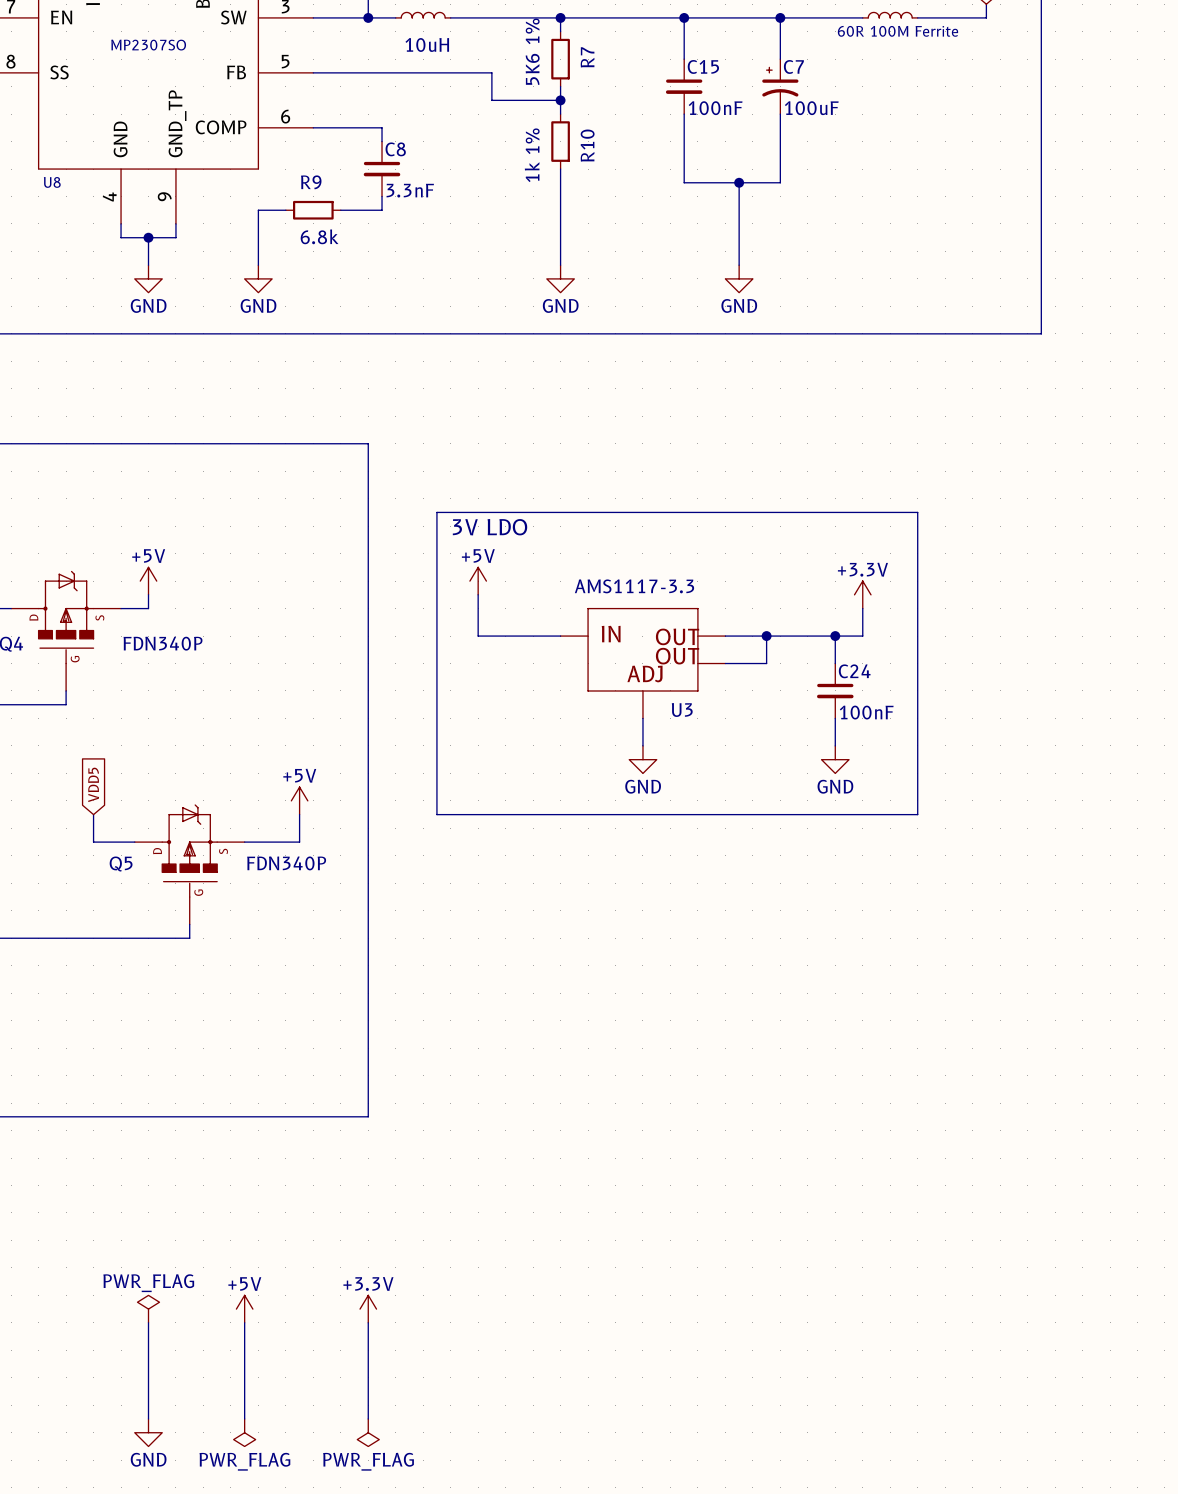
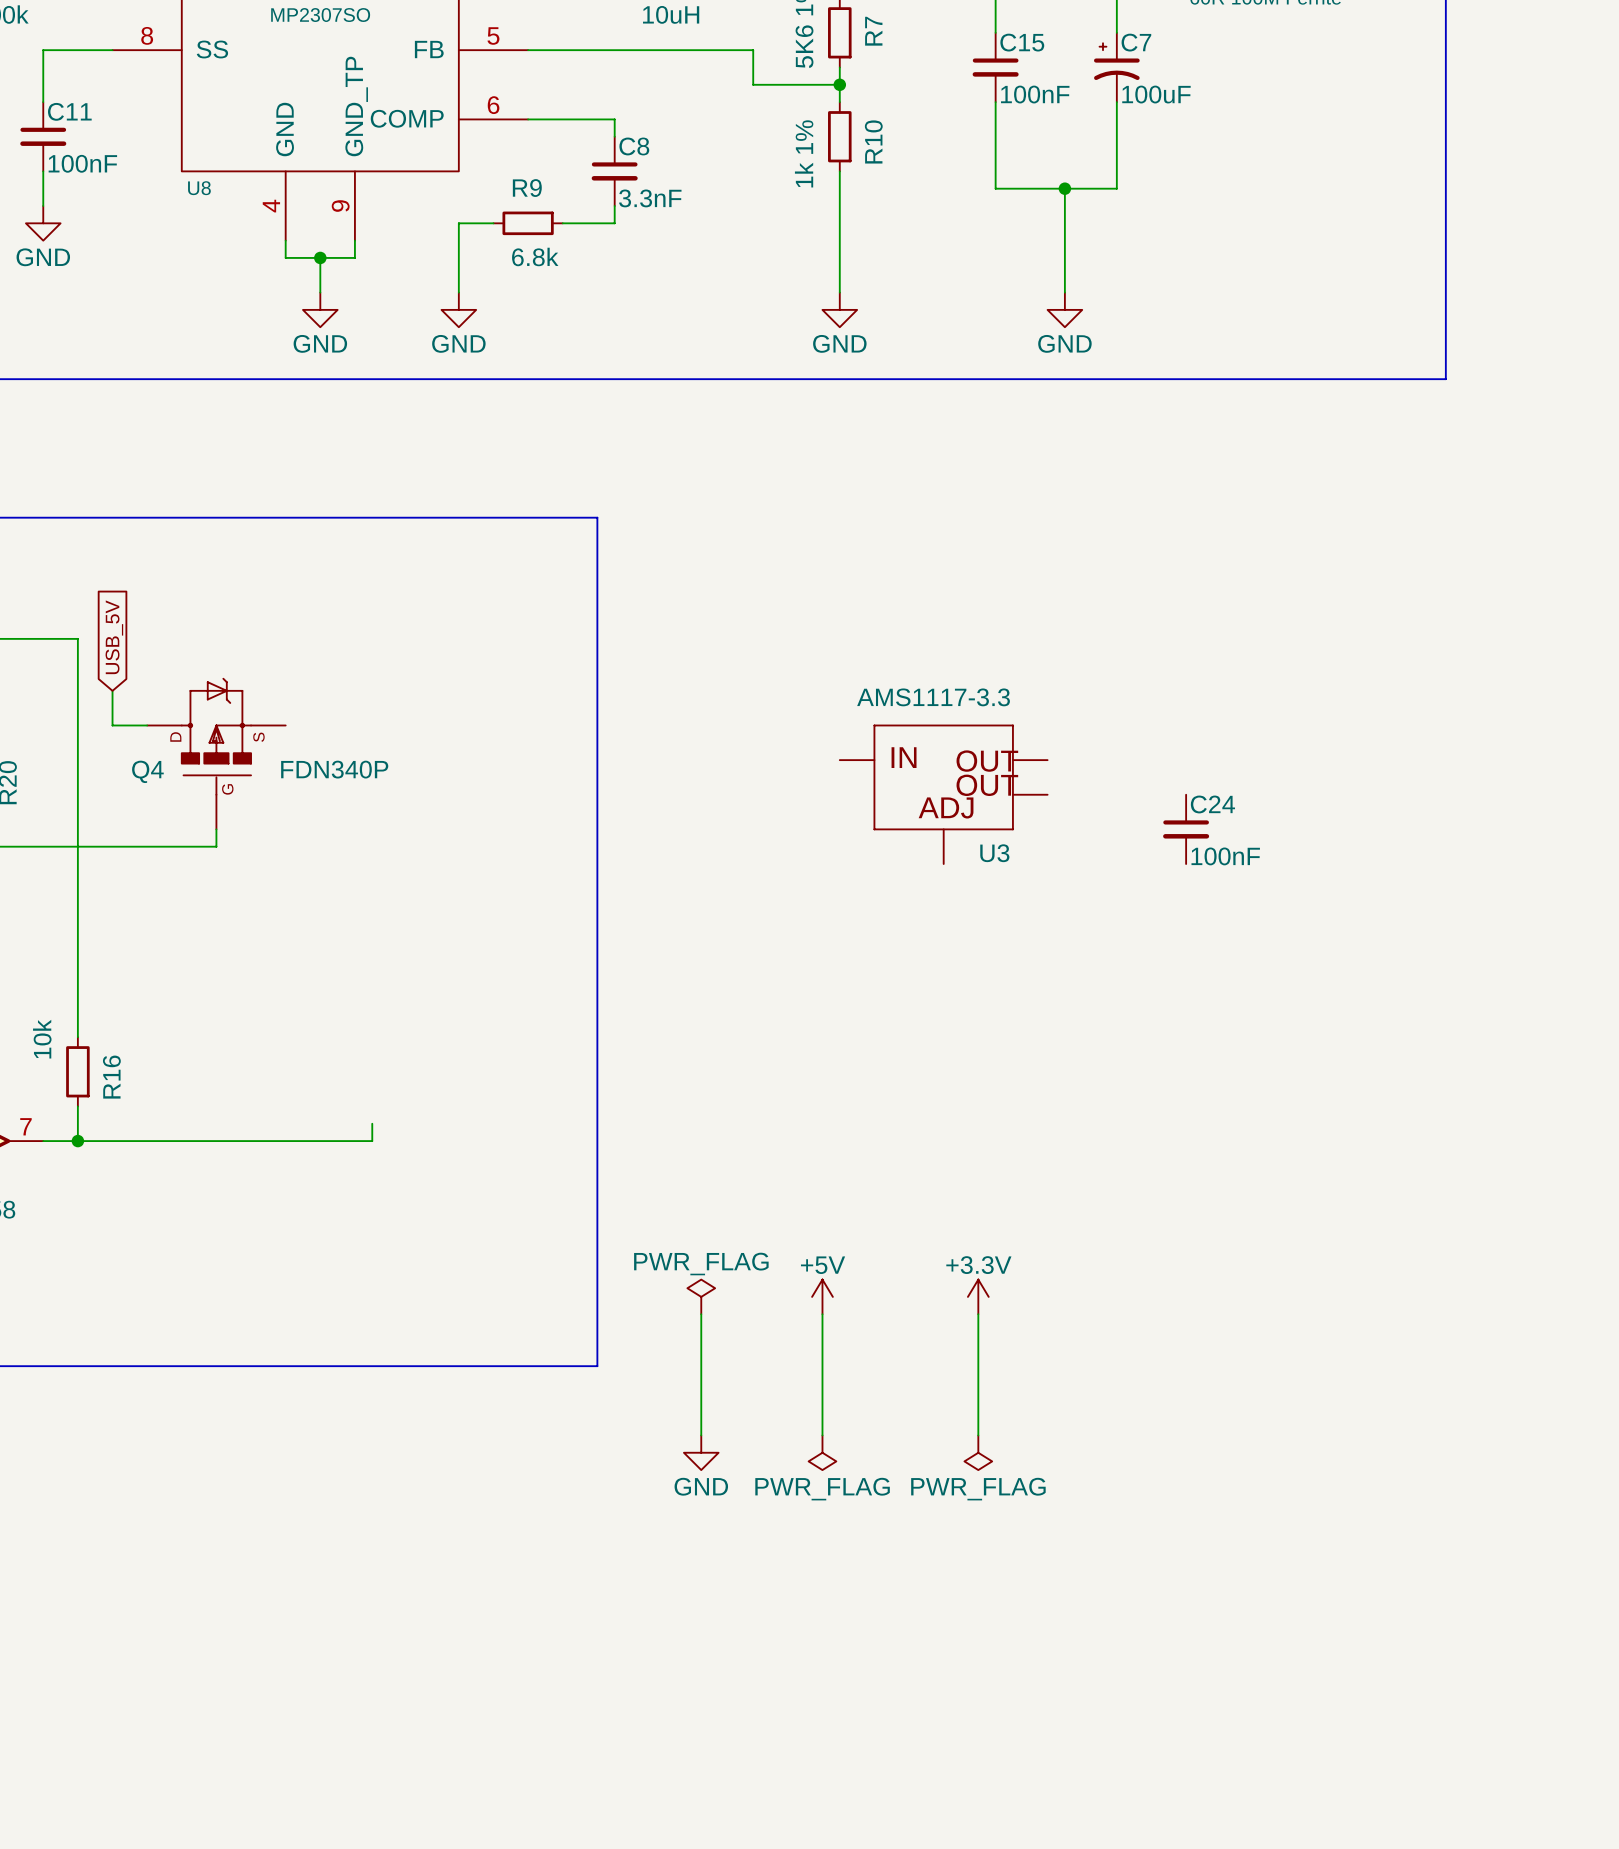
bus: (436, 512) (917, 512) (917, 814) (436, 814) (436, 512) -> none
text: 3V LDO (490, 527) -> none
power symbol: +5V (148, 581) -> none
power symbol: +5V (478, 581) -> none
wire: (148, 594) (148, 608) (121, 608) -> none
wire: (478, 594) (478, 636) (560, 636) -> none
power symbol: +3.3V (862, 594) -> none
wire: (862, 608) (862, 636) (725, 636) -> none
wire: (766, 636) (766, 663) (725, 663) -> none
junction: (766, 636) -> none
wire: (835, 636) (835, 663) -> none
junction: (835, 636) -> none
wire: (642, 718) (642, 745) -> none
wire: (835, 718) (835, 745) -> none
power symbol: GND (642, 759) -> none
power symbol: GND (835, 759) -> none
global label: VDD5 (93, 784) -> none
power symbol: +5V (299, 800) -> none
wire: (93, 814) (93, 842) (134, 842) -> none
wire: (299, 814) (299, 842) (244, 842) -> none
Q5: FDN340P (189, 864) -> none
power symbol: none -> PWR_FLAG (701, 1296)
power symbol: none -> +5V (822, 1296)
power symbol: none -> +3.3V (978, 1296)
wire: none -> (822, 1314) (822, 1435)
wire: none -> (978, 1314) (978, 1435)
power symbol: none -> GND (701, 1452)
power symbol: none -> PWR_FLAG (822, 1452)
power symbol: none -> PWR_FLAG (978, 1452)
power symbol: PWR_FLAG (148, 1309) -> none
power symbol: +5V (244, 1309) -> none
power symbol: +3.3V (368, 1309) -> none
wire: (148, 1322) (148, 1418) -> none
wire: (244, 1322) (244, 1418) -> none
wire: (368, 1322) (368, 1418) -> (701, 1314) (701, 1435)
power symbol: GND (148, 1432) -> none
power symbol: PWR_FLAG (244, 1432) -> none
power symbol: PWR_FLAG (368, 1432) -> none

